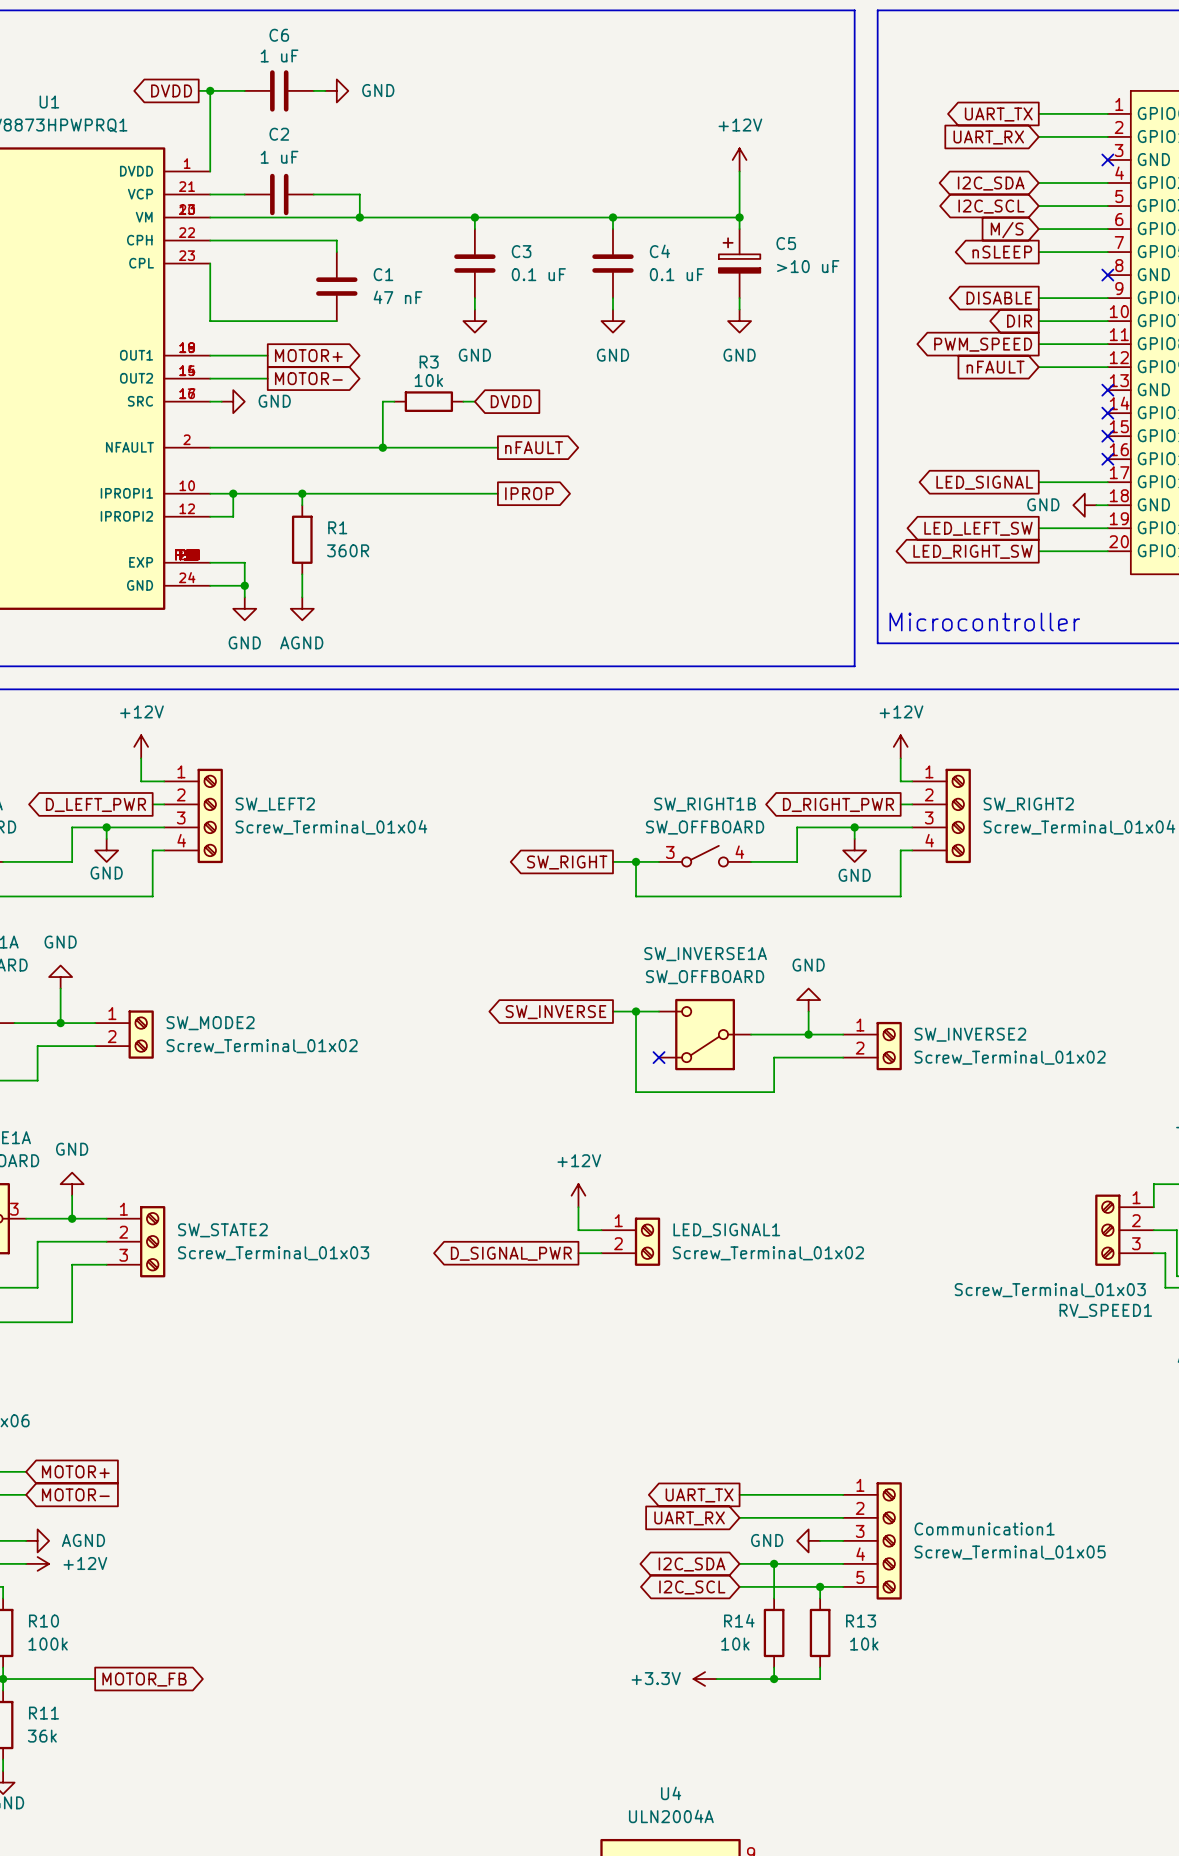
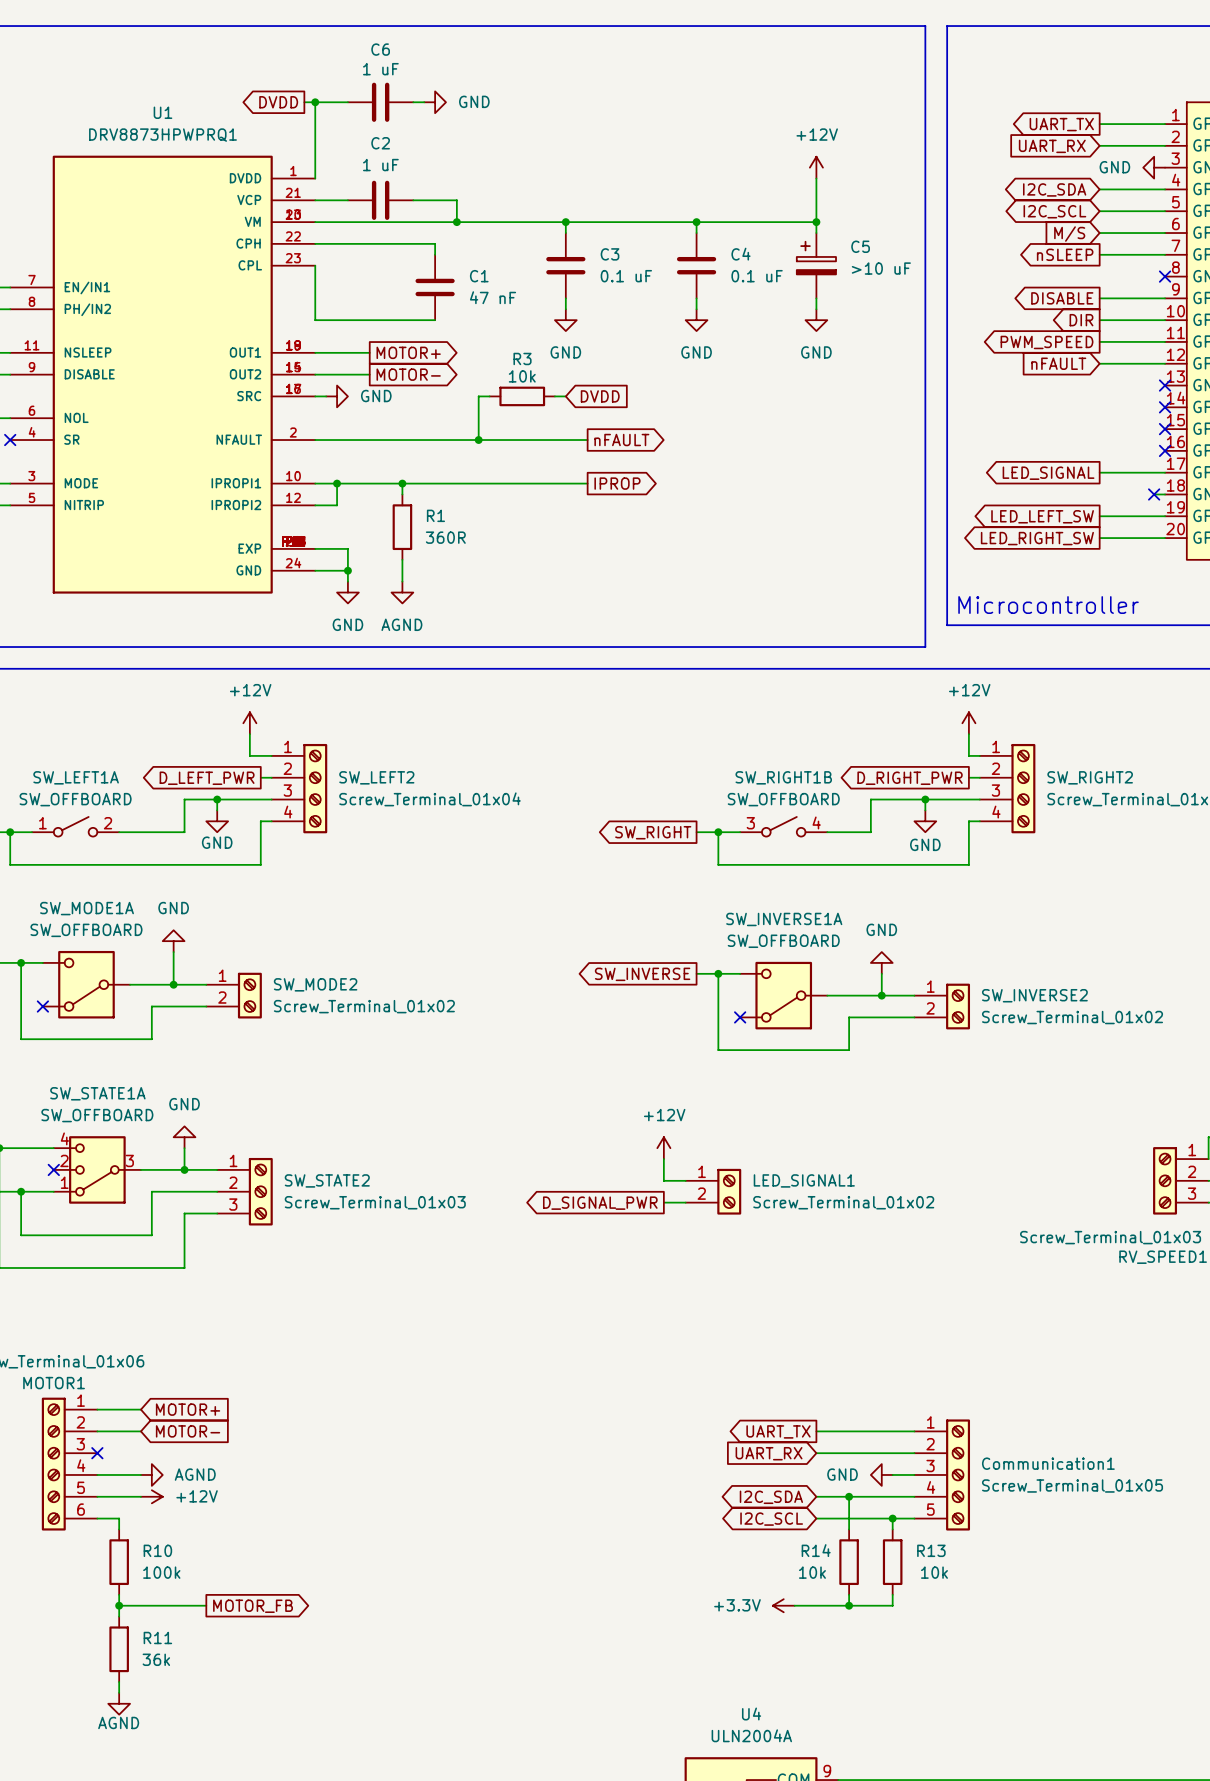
power symbol: none -> GND (1154, 167)
no-connect mark: (1107, 159) -> none
power symbol: GND (1084, 505) -> none
no-connect mark: none -> (1154, 494)

